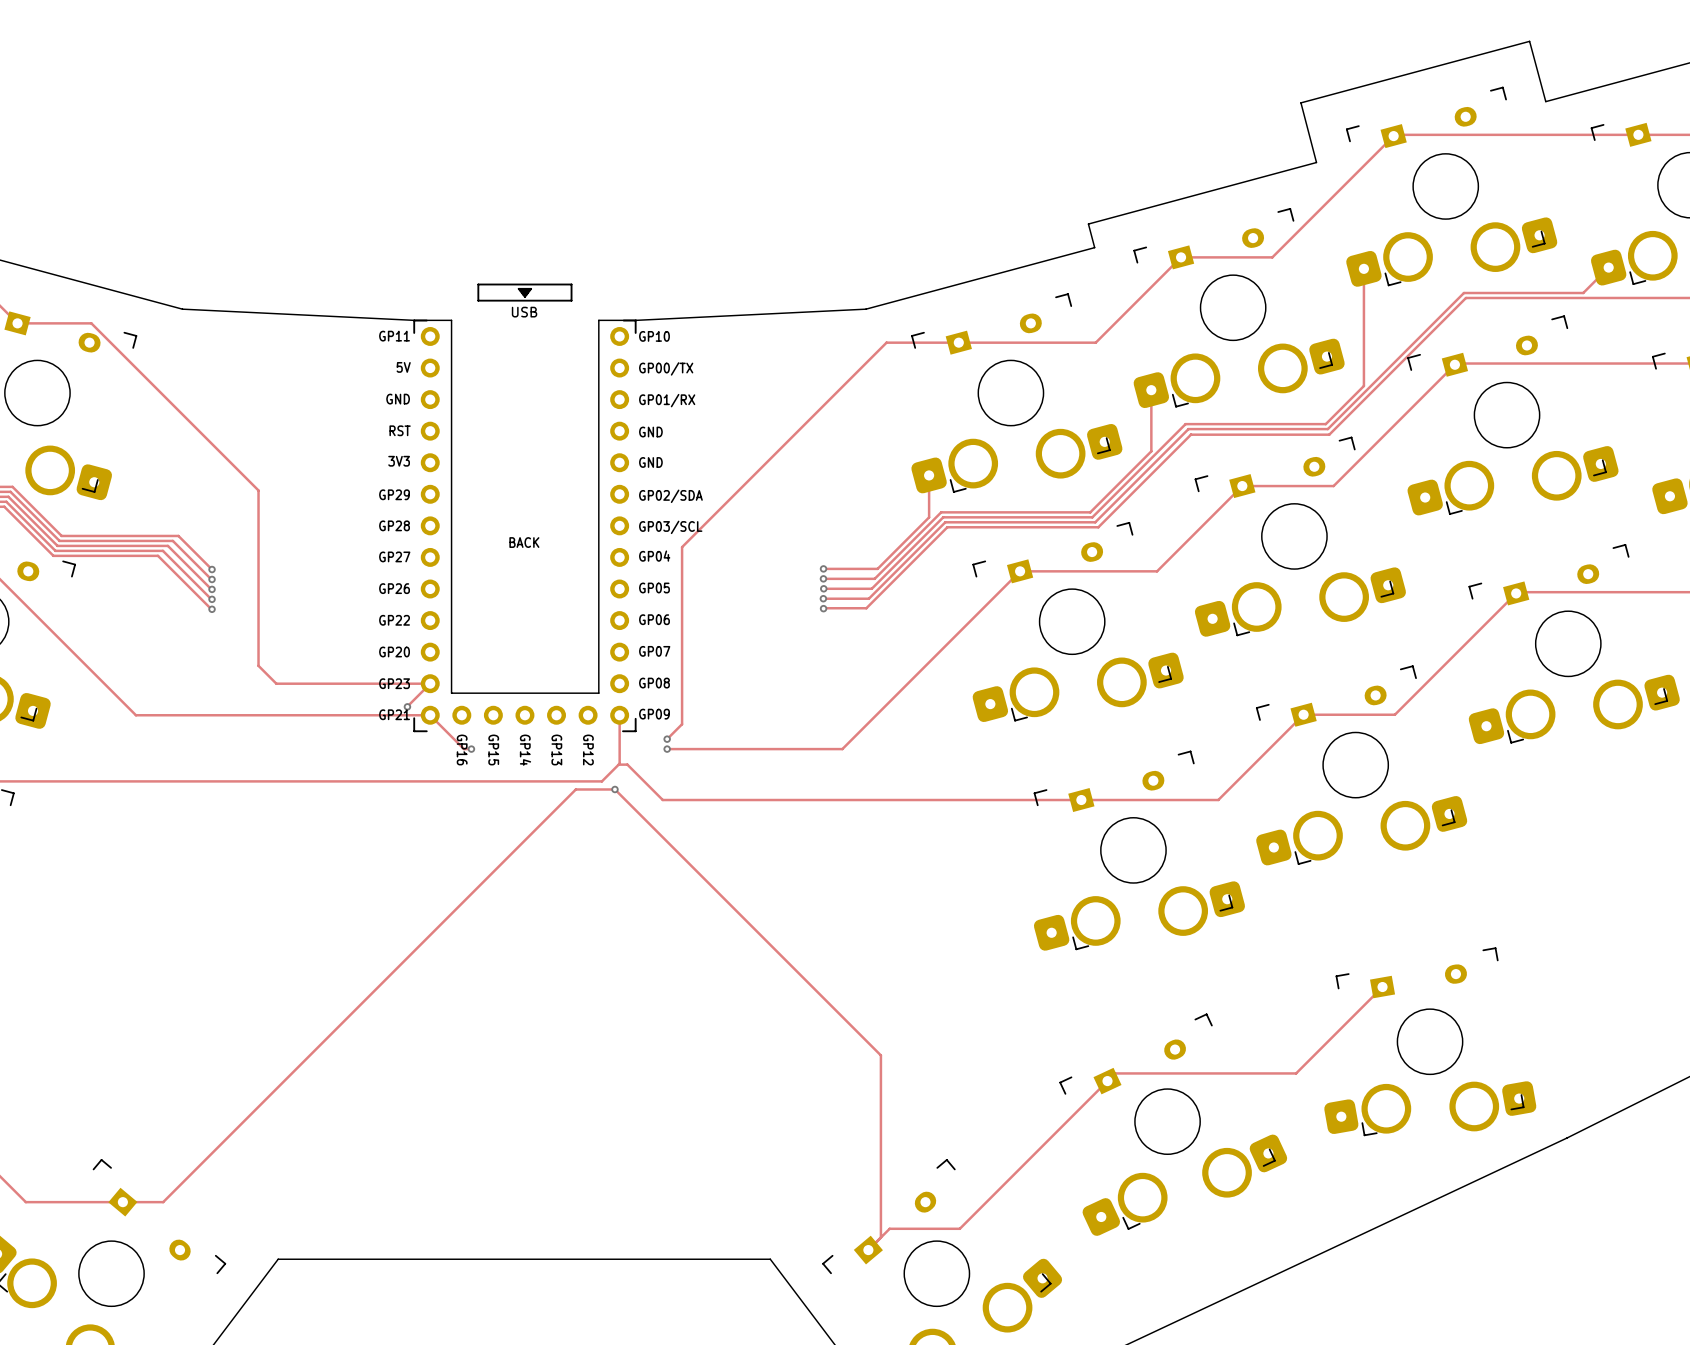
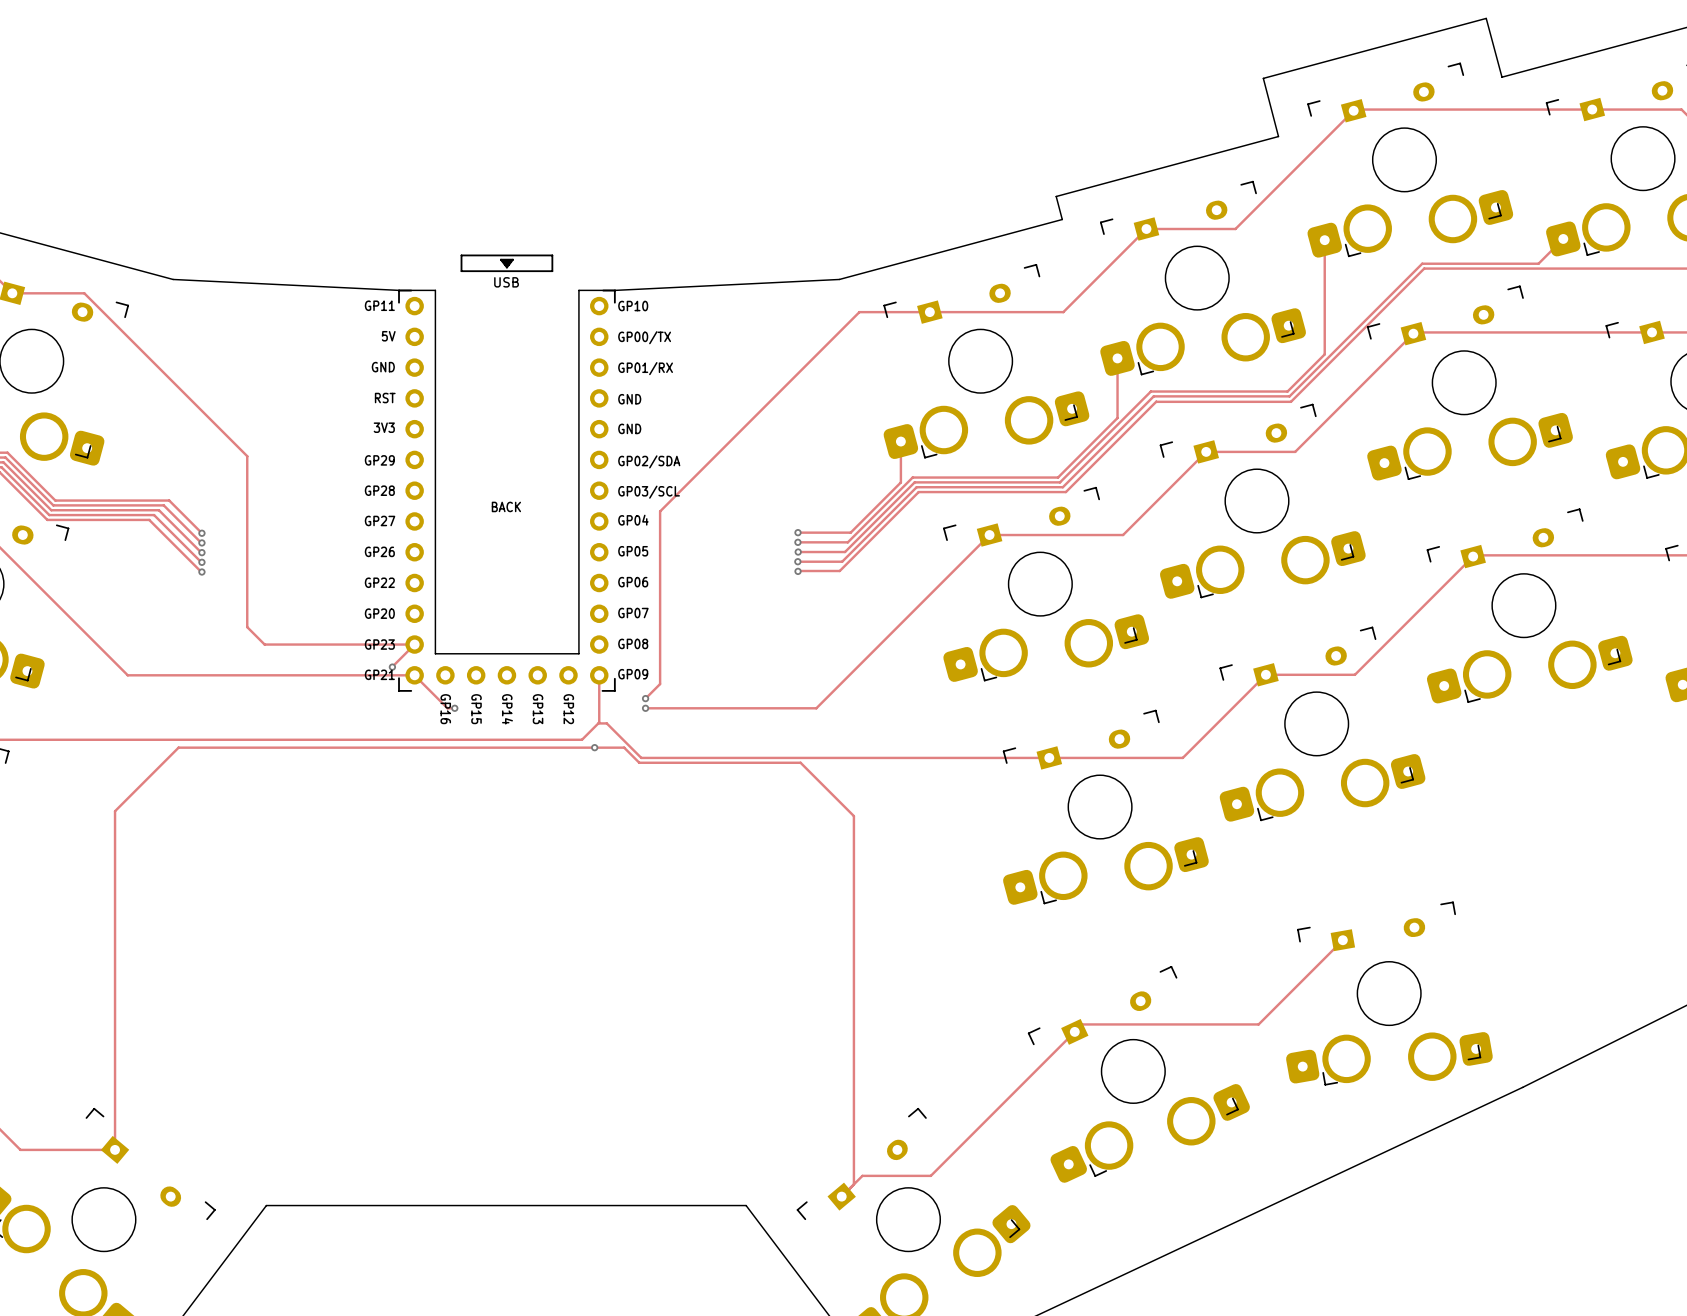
track: (575, 789) (163, 1202) (122, 1202) -> (556, 747) (178, 747) (115, 811) (115, 1149)
track: (614, 789) (880, 1055) -> (594, 747) (624, 747) (639, 762) (800, 762) (853, 816) (853, 1006)

